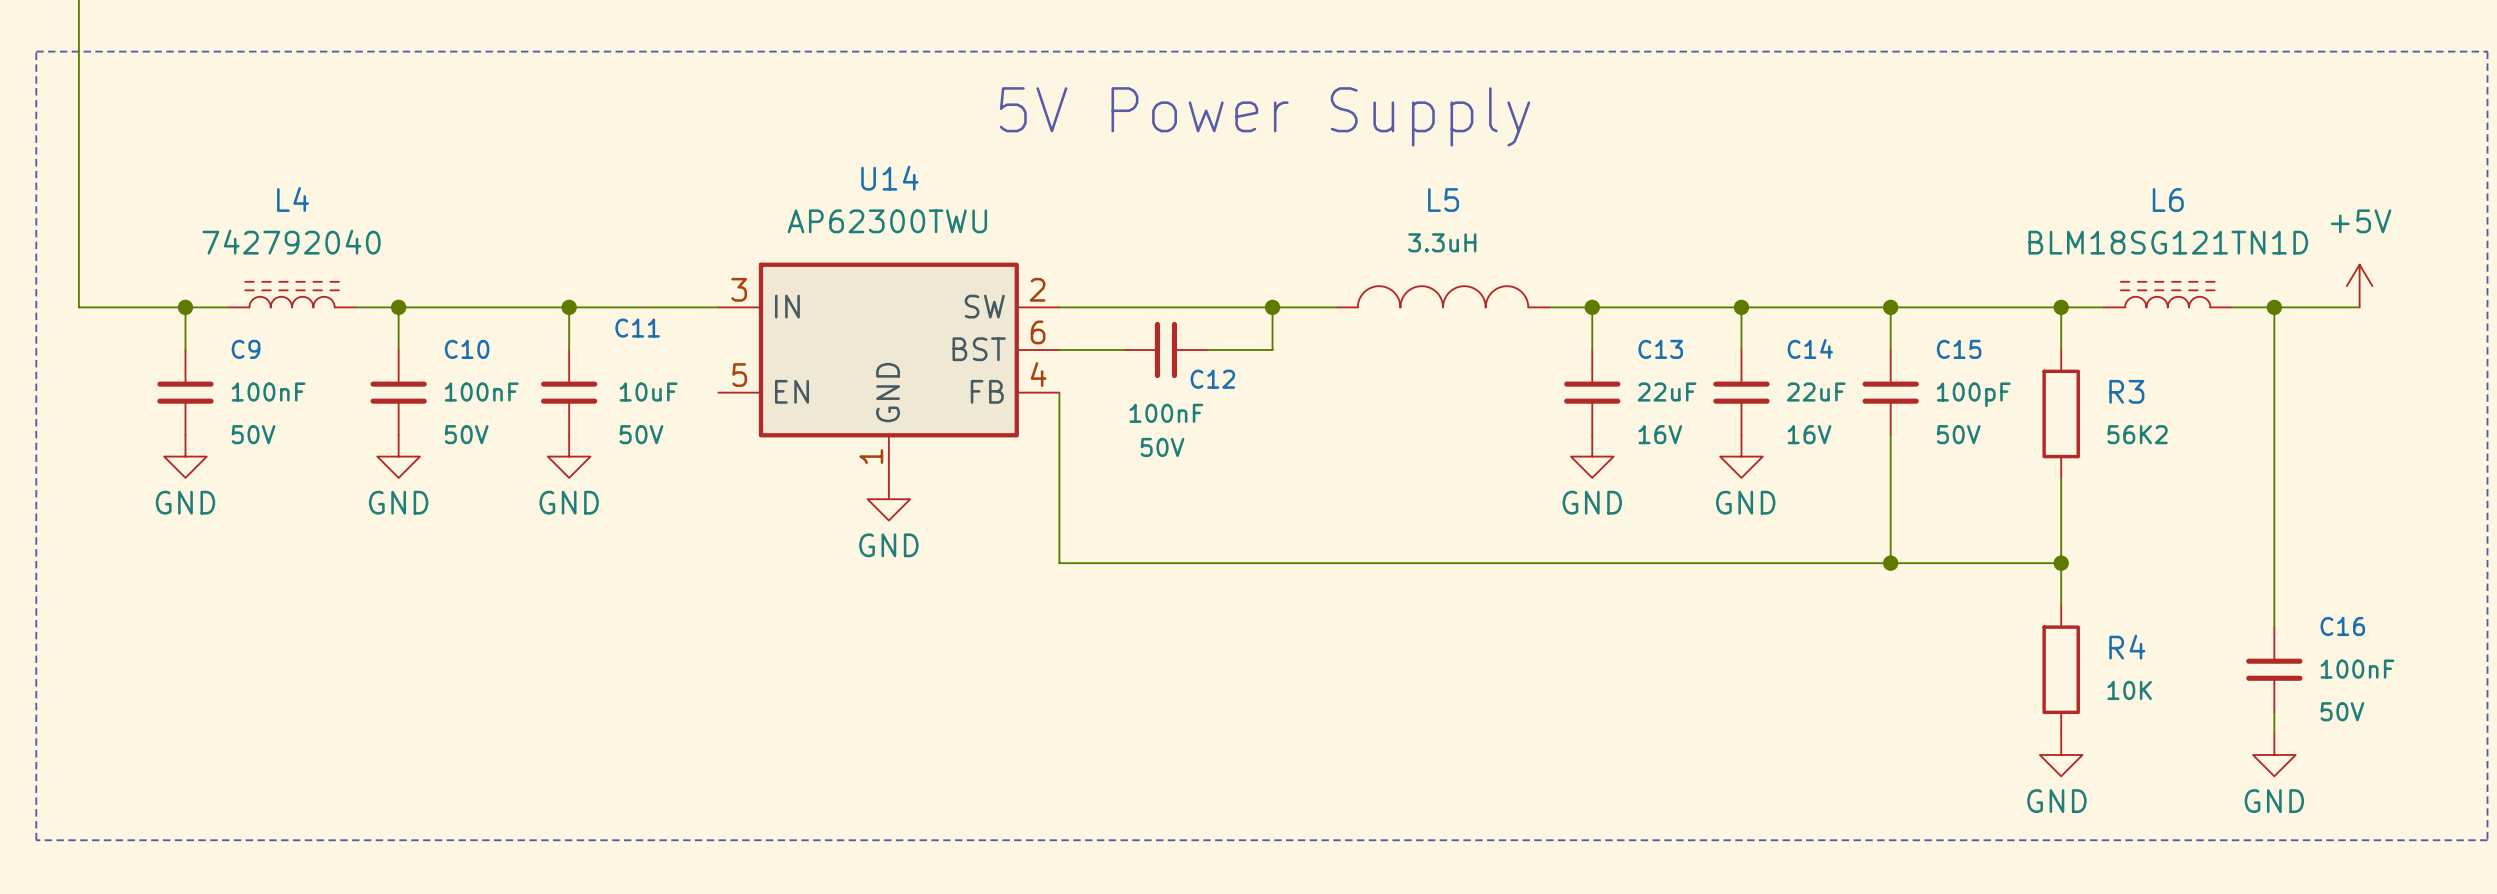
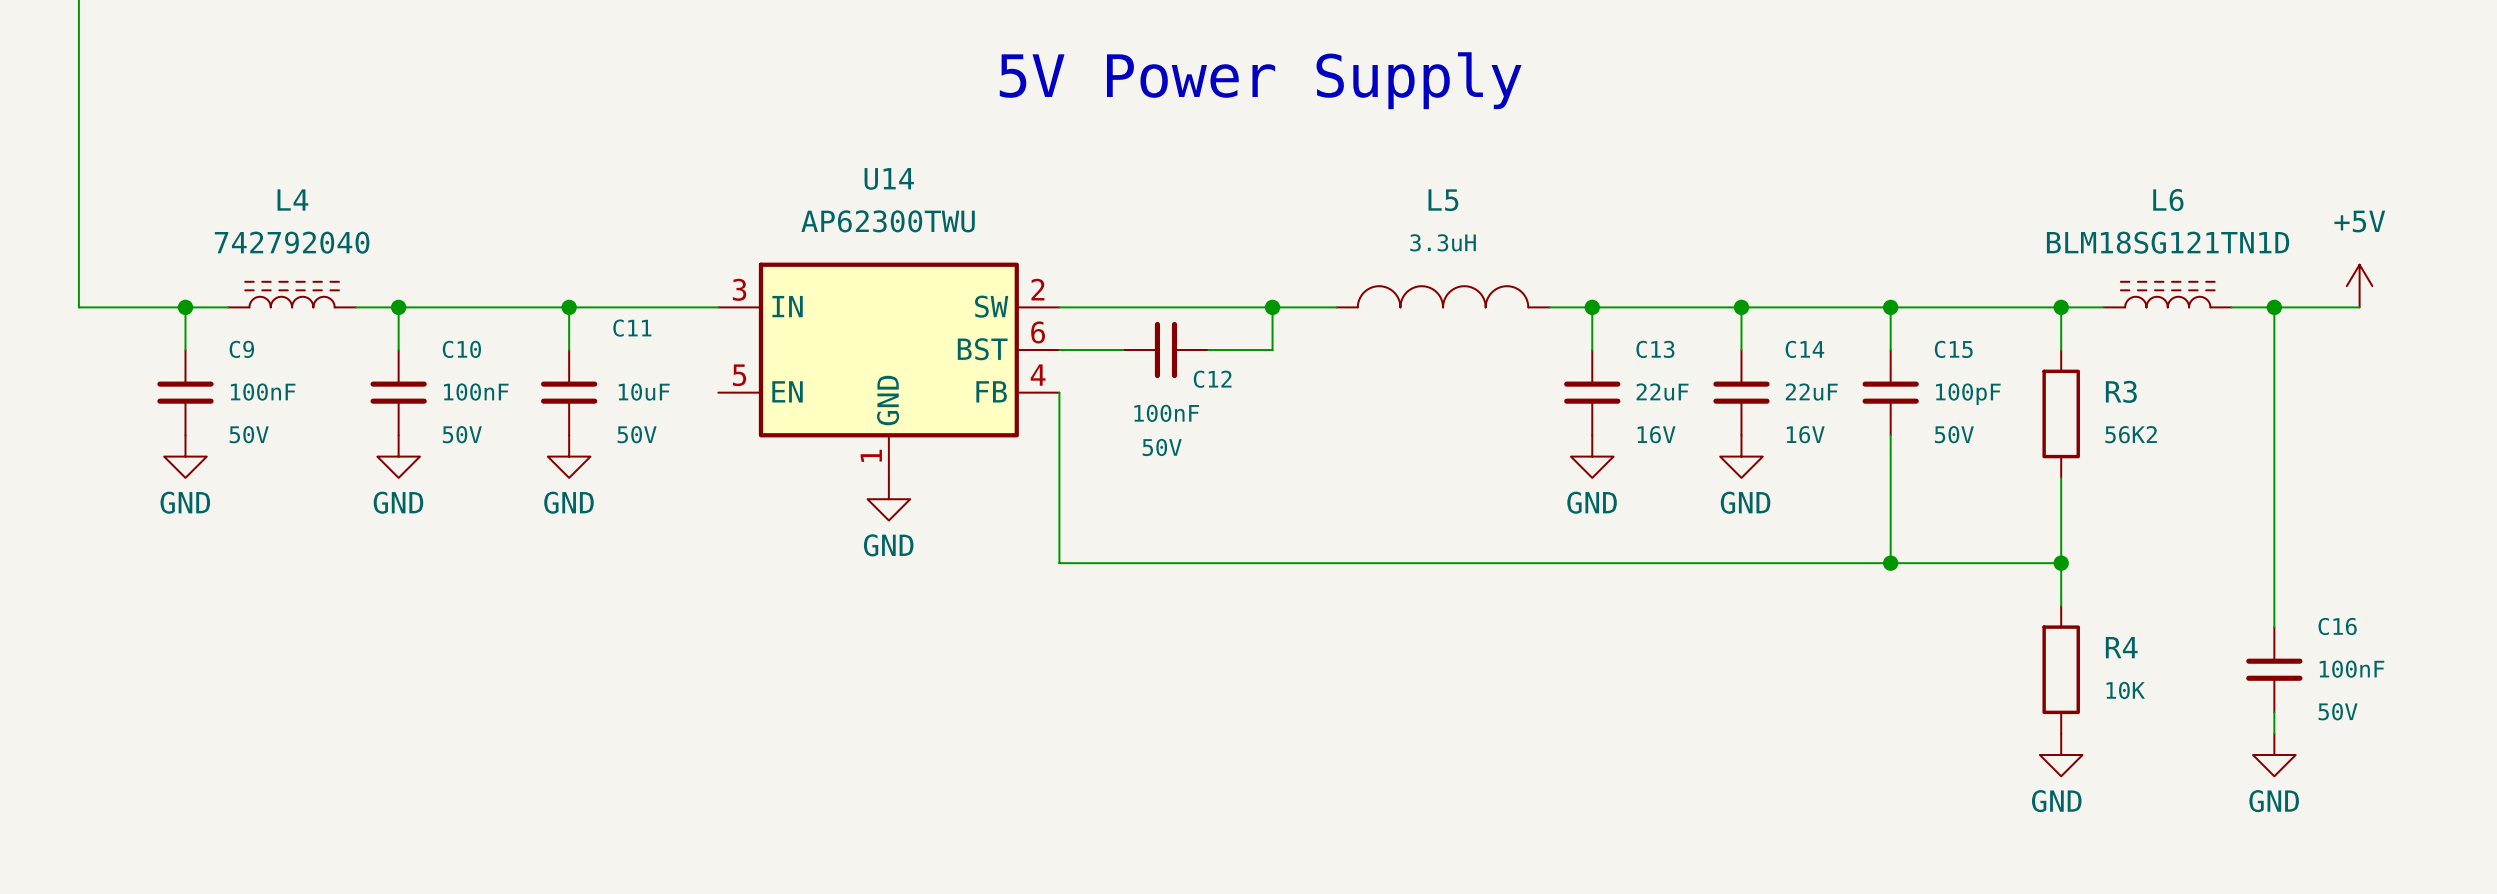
line: (36, 51) (2487, 51) (2487, 840) (36, 840) (36, 51) -> none
text position: 5V Power Supply (1265, 116) -> 5V Power Supply (1260, 80)

